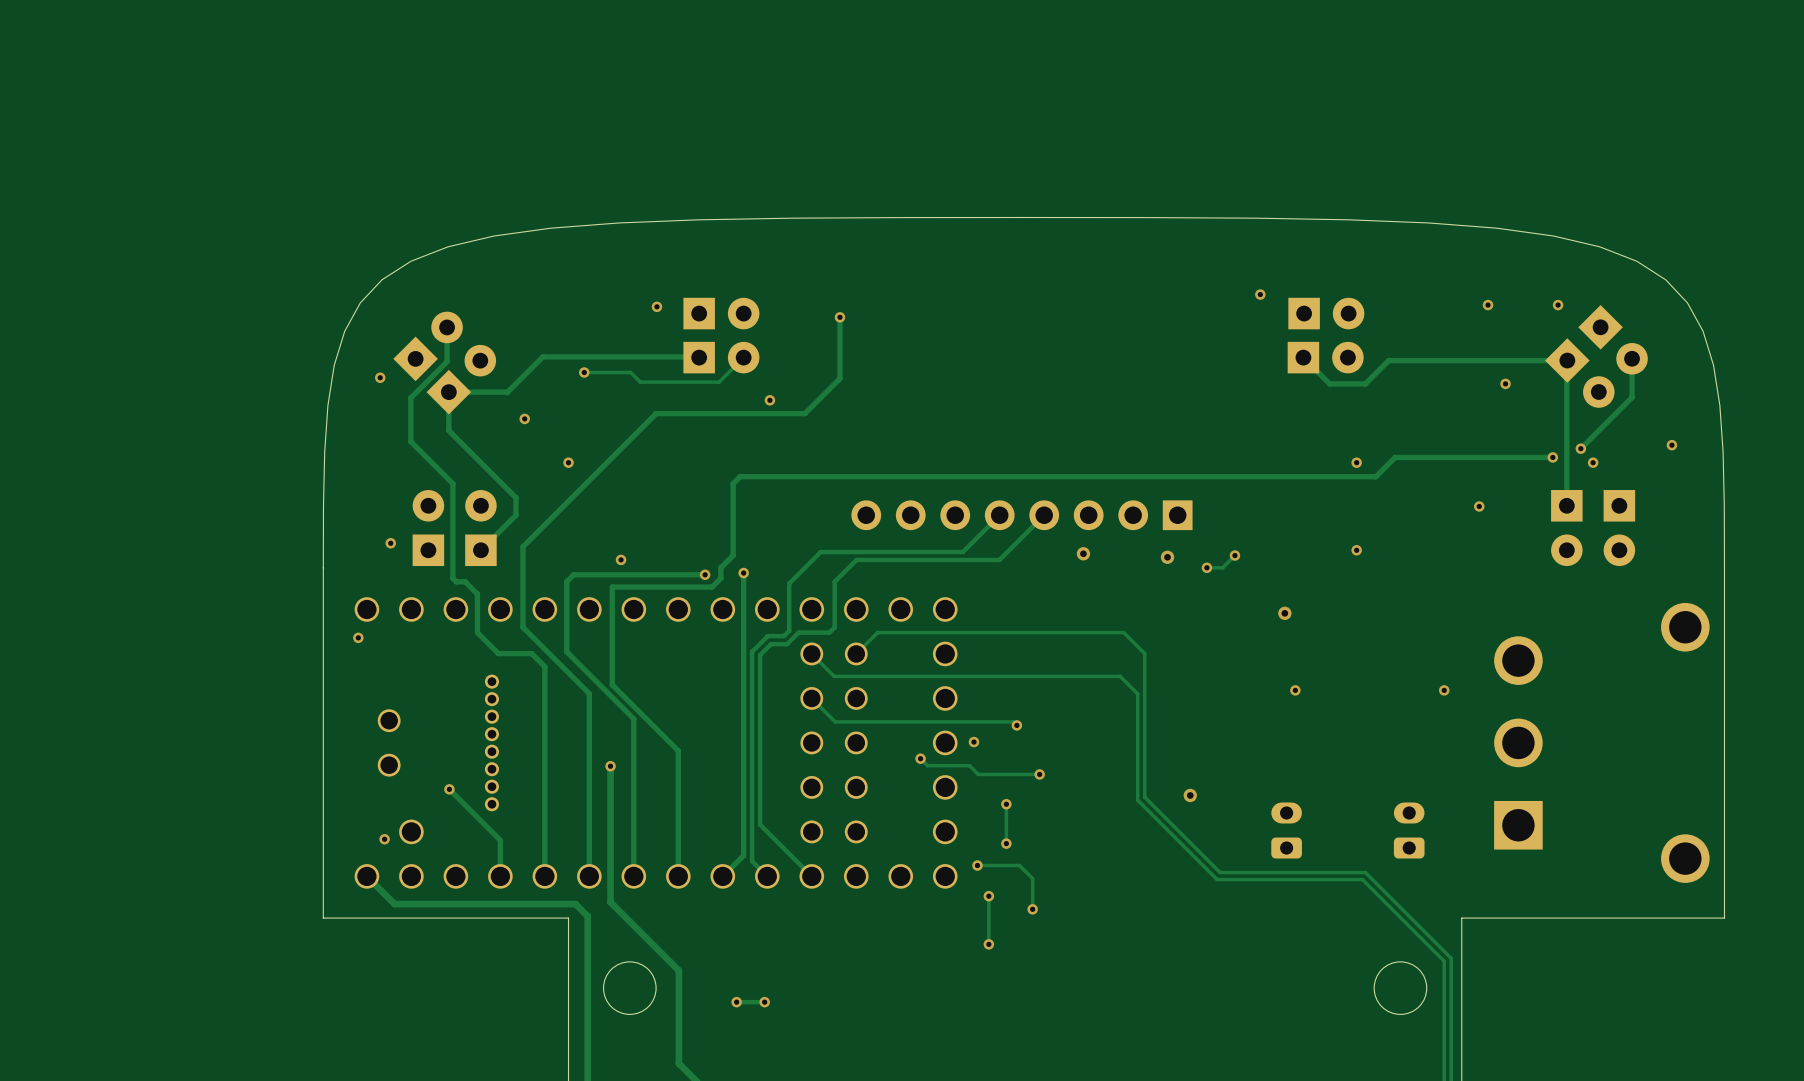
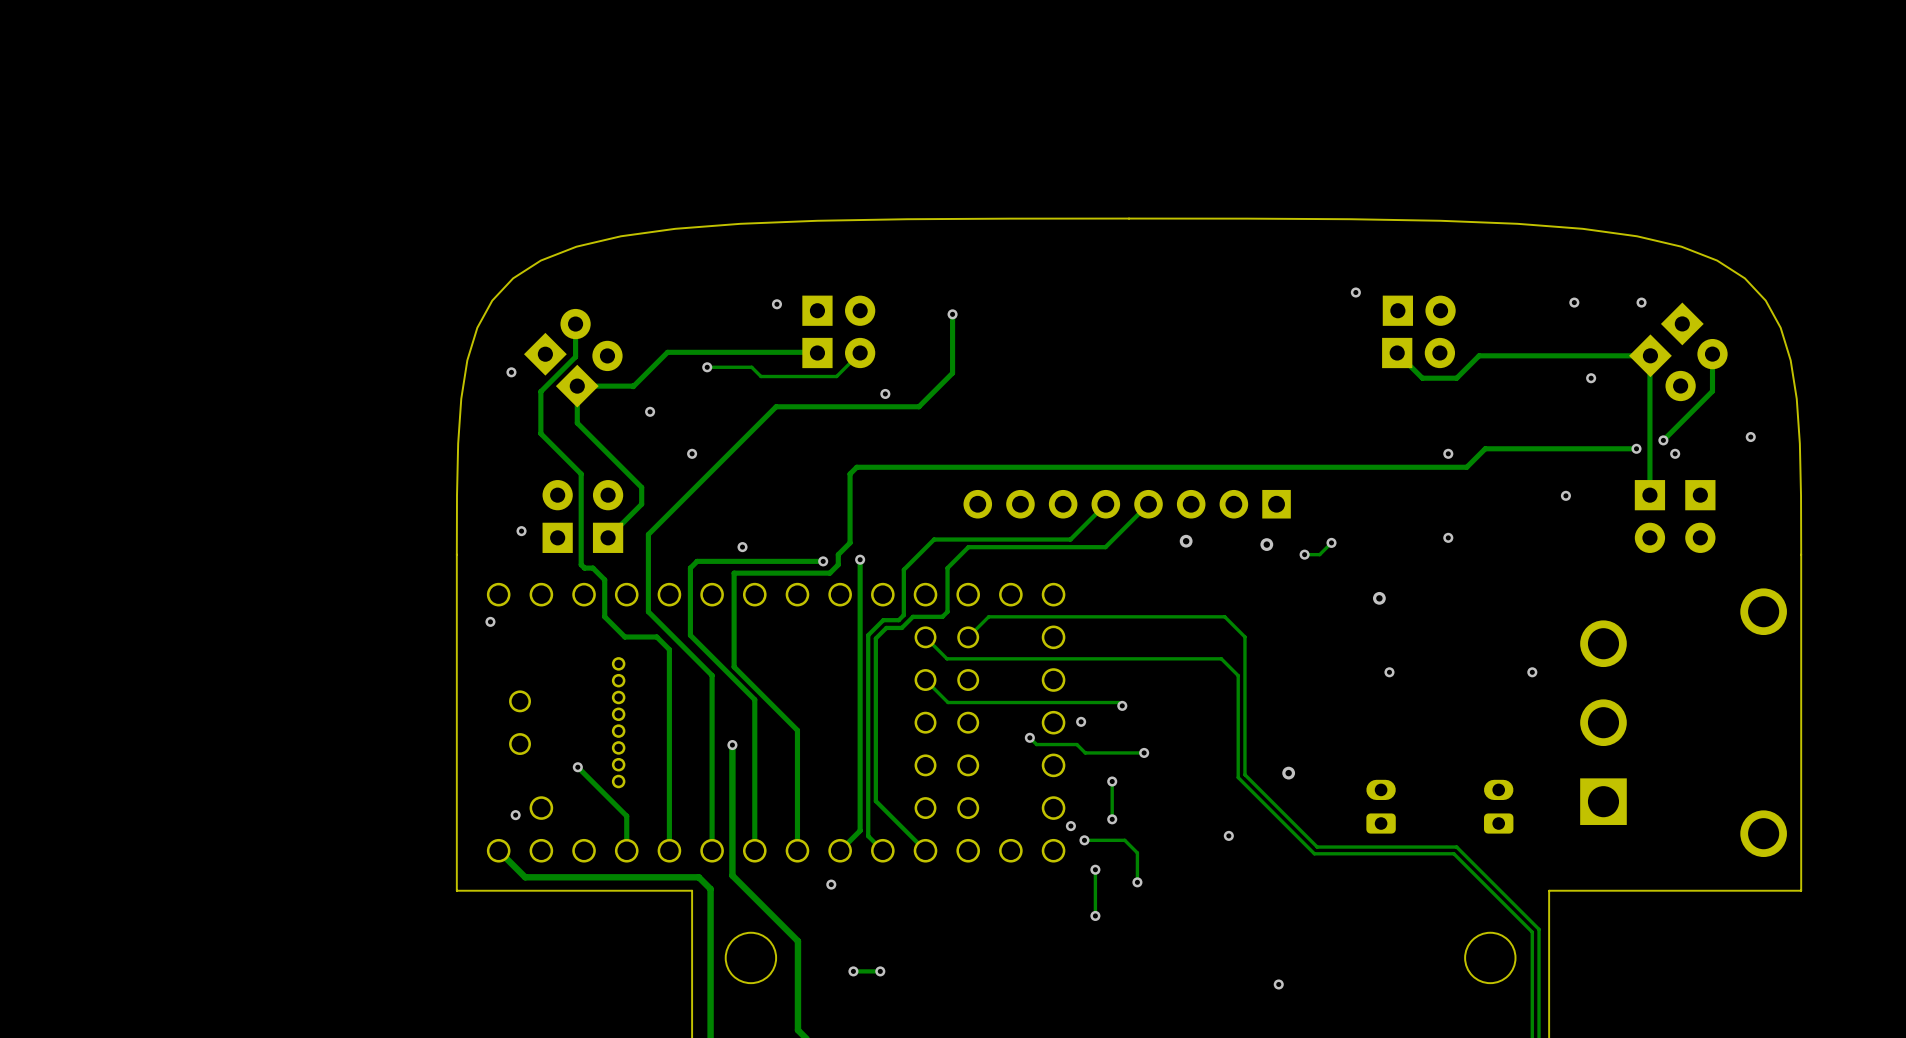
via: none -> (1070, 826)
via: none -> (1228, 835)
via: none -> (831, 884)
via: none -> (1278, 984)

